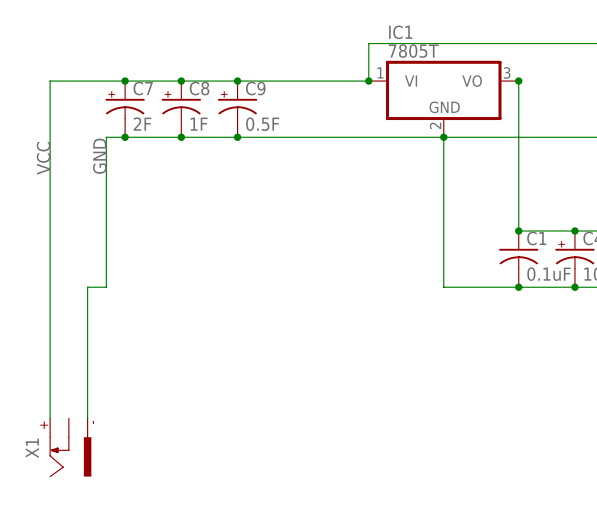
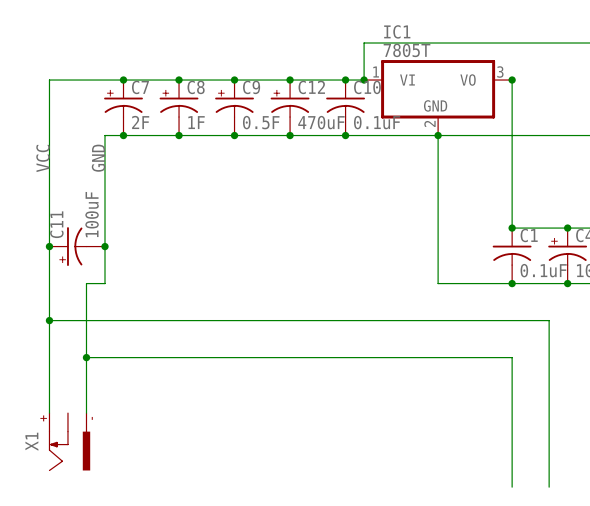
junction: none -> (290, 80)
junction: none -> (345, 80)
C12: none -> 470uF (290, 107)
C10: none -> 0.1uF (345, 107)
junction: none -> (290, 135)
junction: none -> (345, 135)
junction: none -> (49, 246)
C11: none -> 100uF (77, 246)
junction: none -> (104, 246)
wire: none -> (49, 320) (549, 320) (549, 487)
junction: none -> (49, 320)
wire: none -> (86, 357) (512, 357) (512, 487)
junction: none -> (86, 357)

